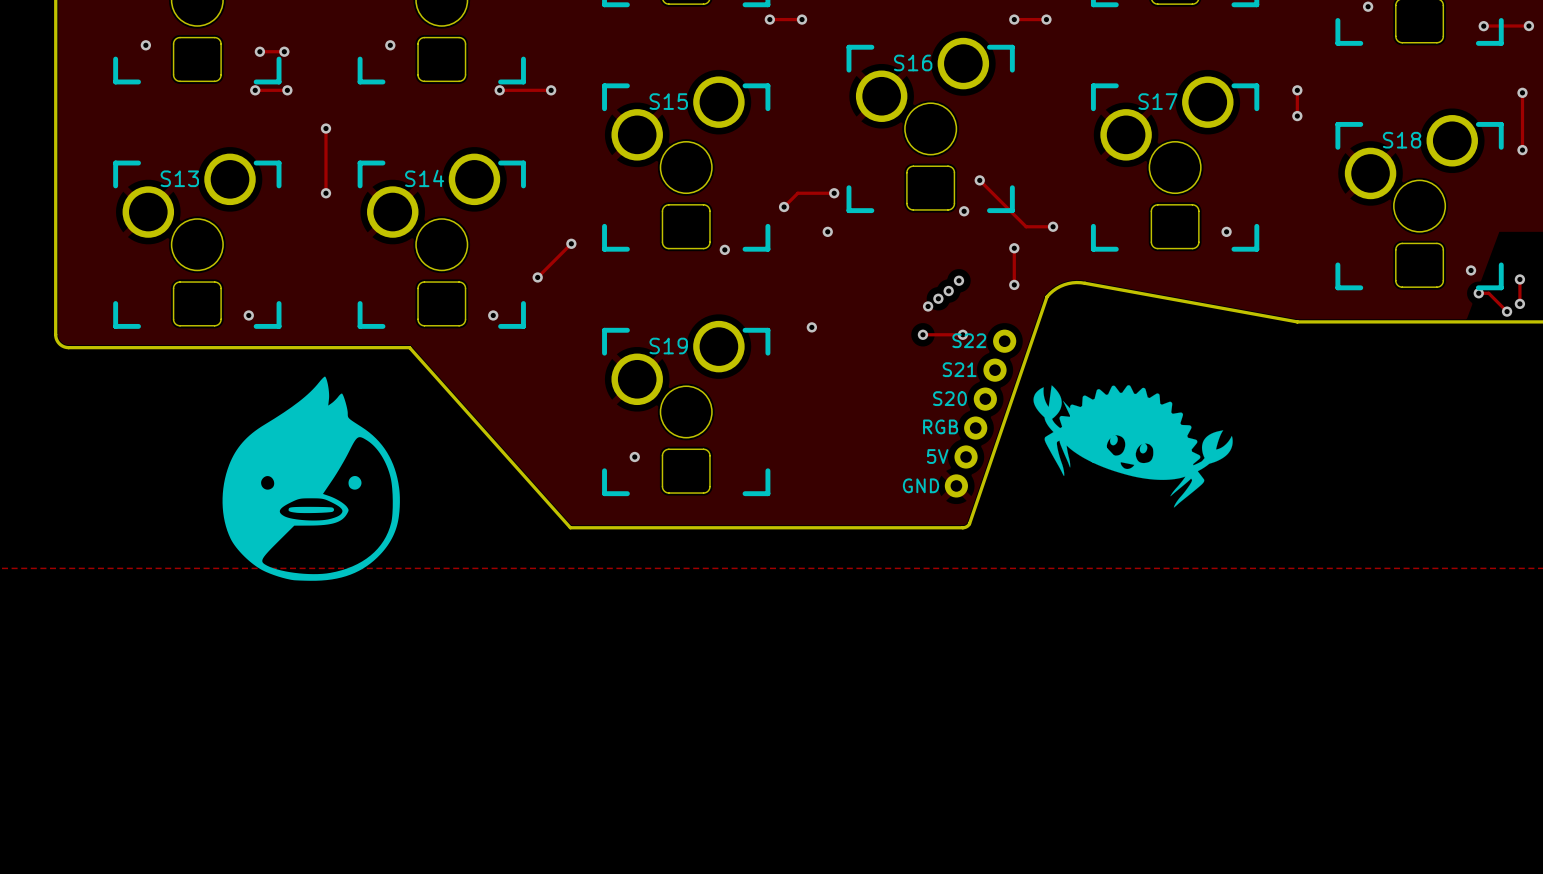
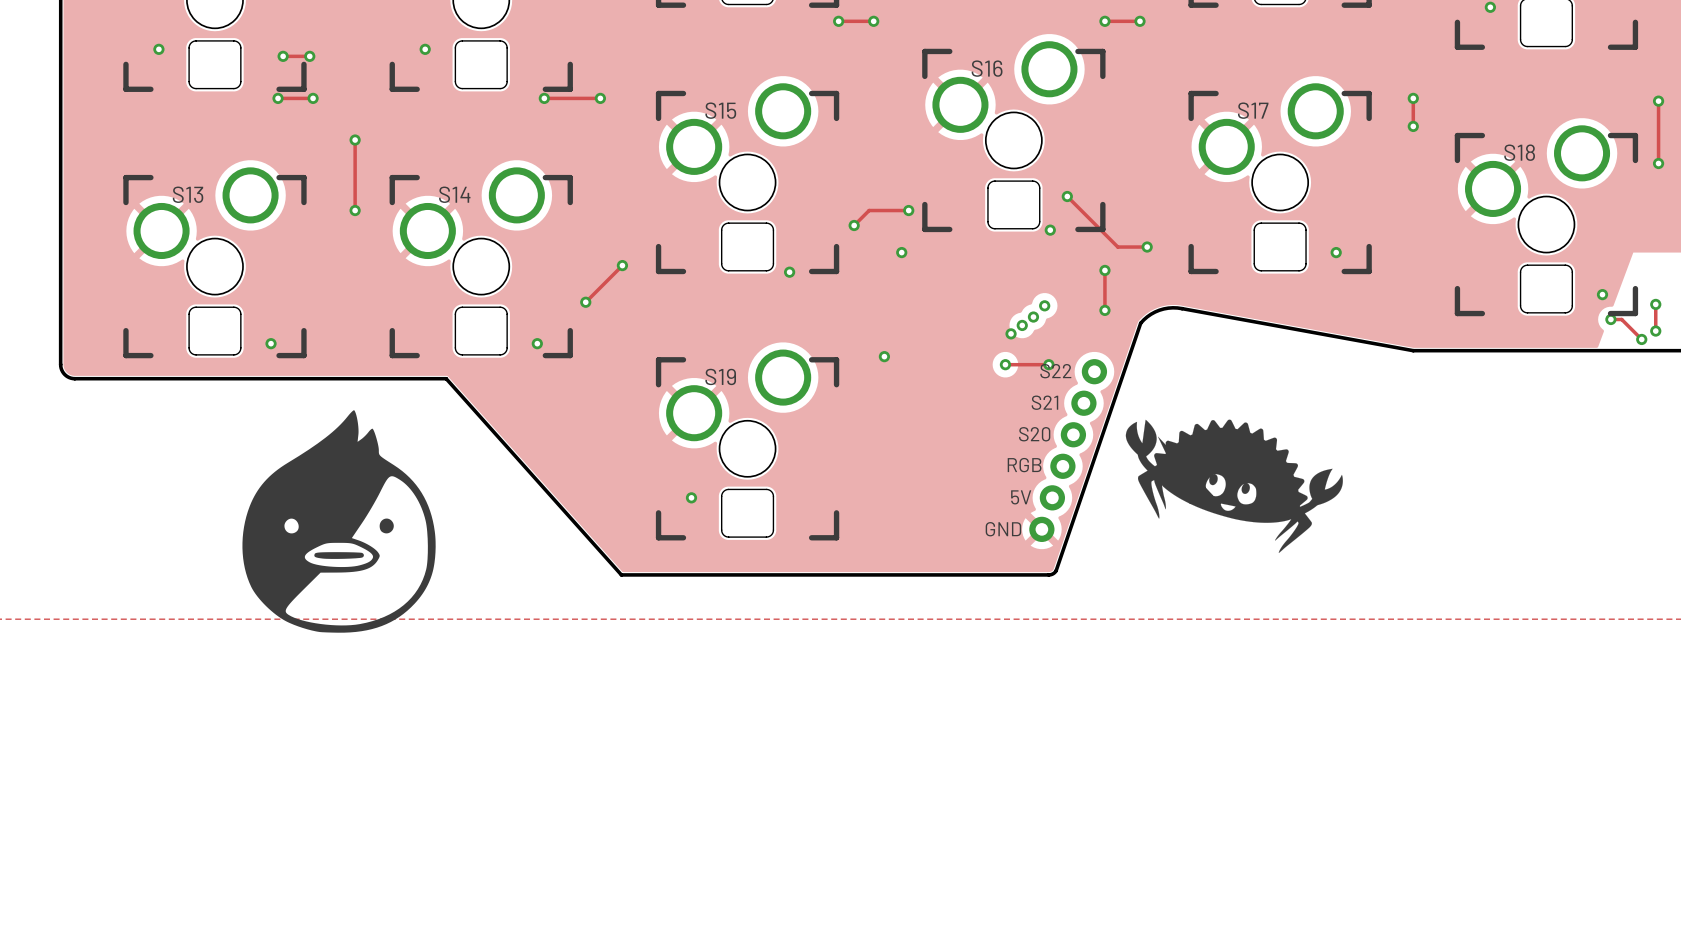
track: (1483, 26) (1528, 26) -> none
via: (1483, 26) -> none
via: (1528, 26) -> none

